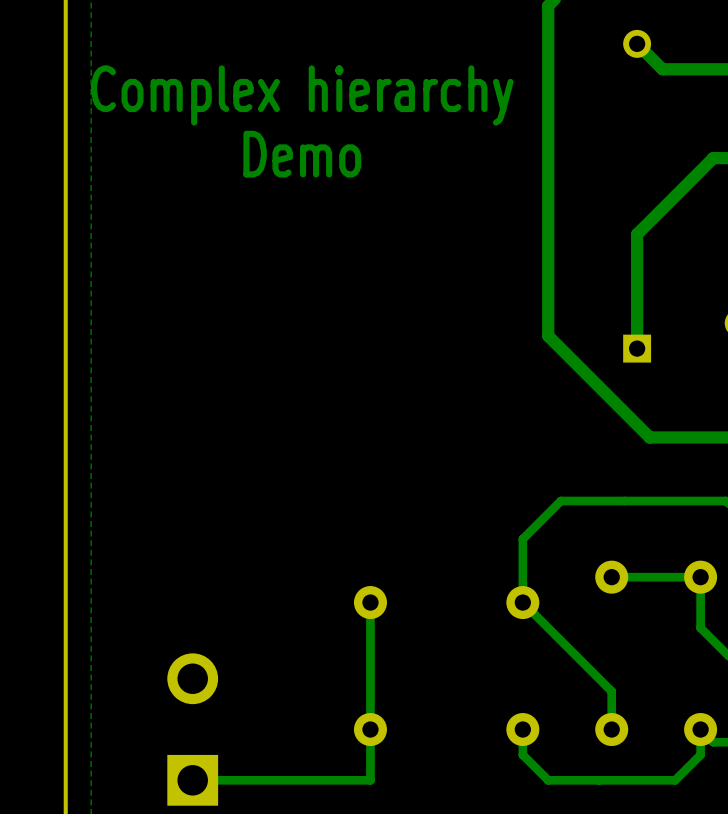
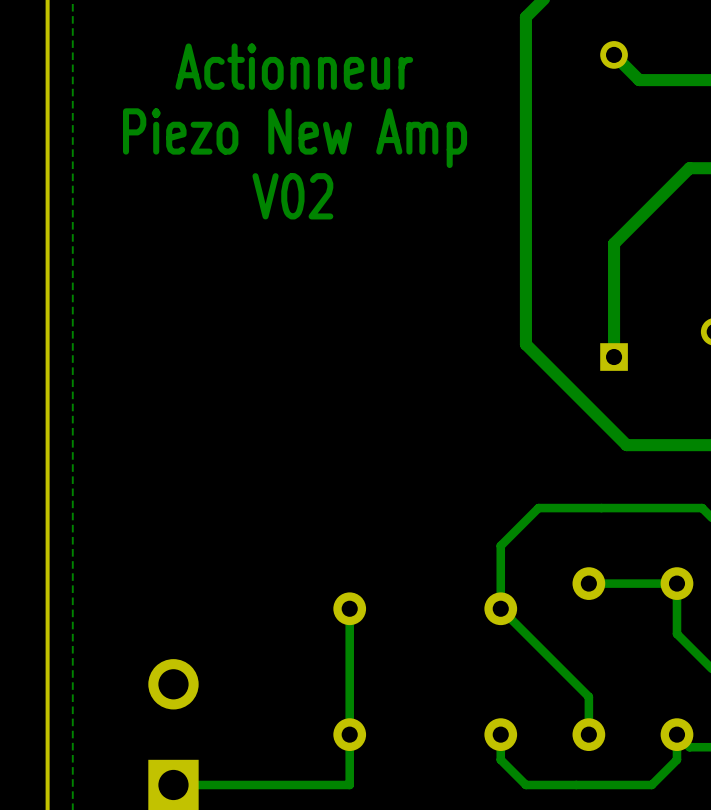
text: none -> Actionneur (294, 66)
text: Complex hierarchy (302, 95) -> none
text: none -> Piezo New Amp (295, 138)
text: Demo (302, 154) -> none
text: none -> V02 (292, 196)

